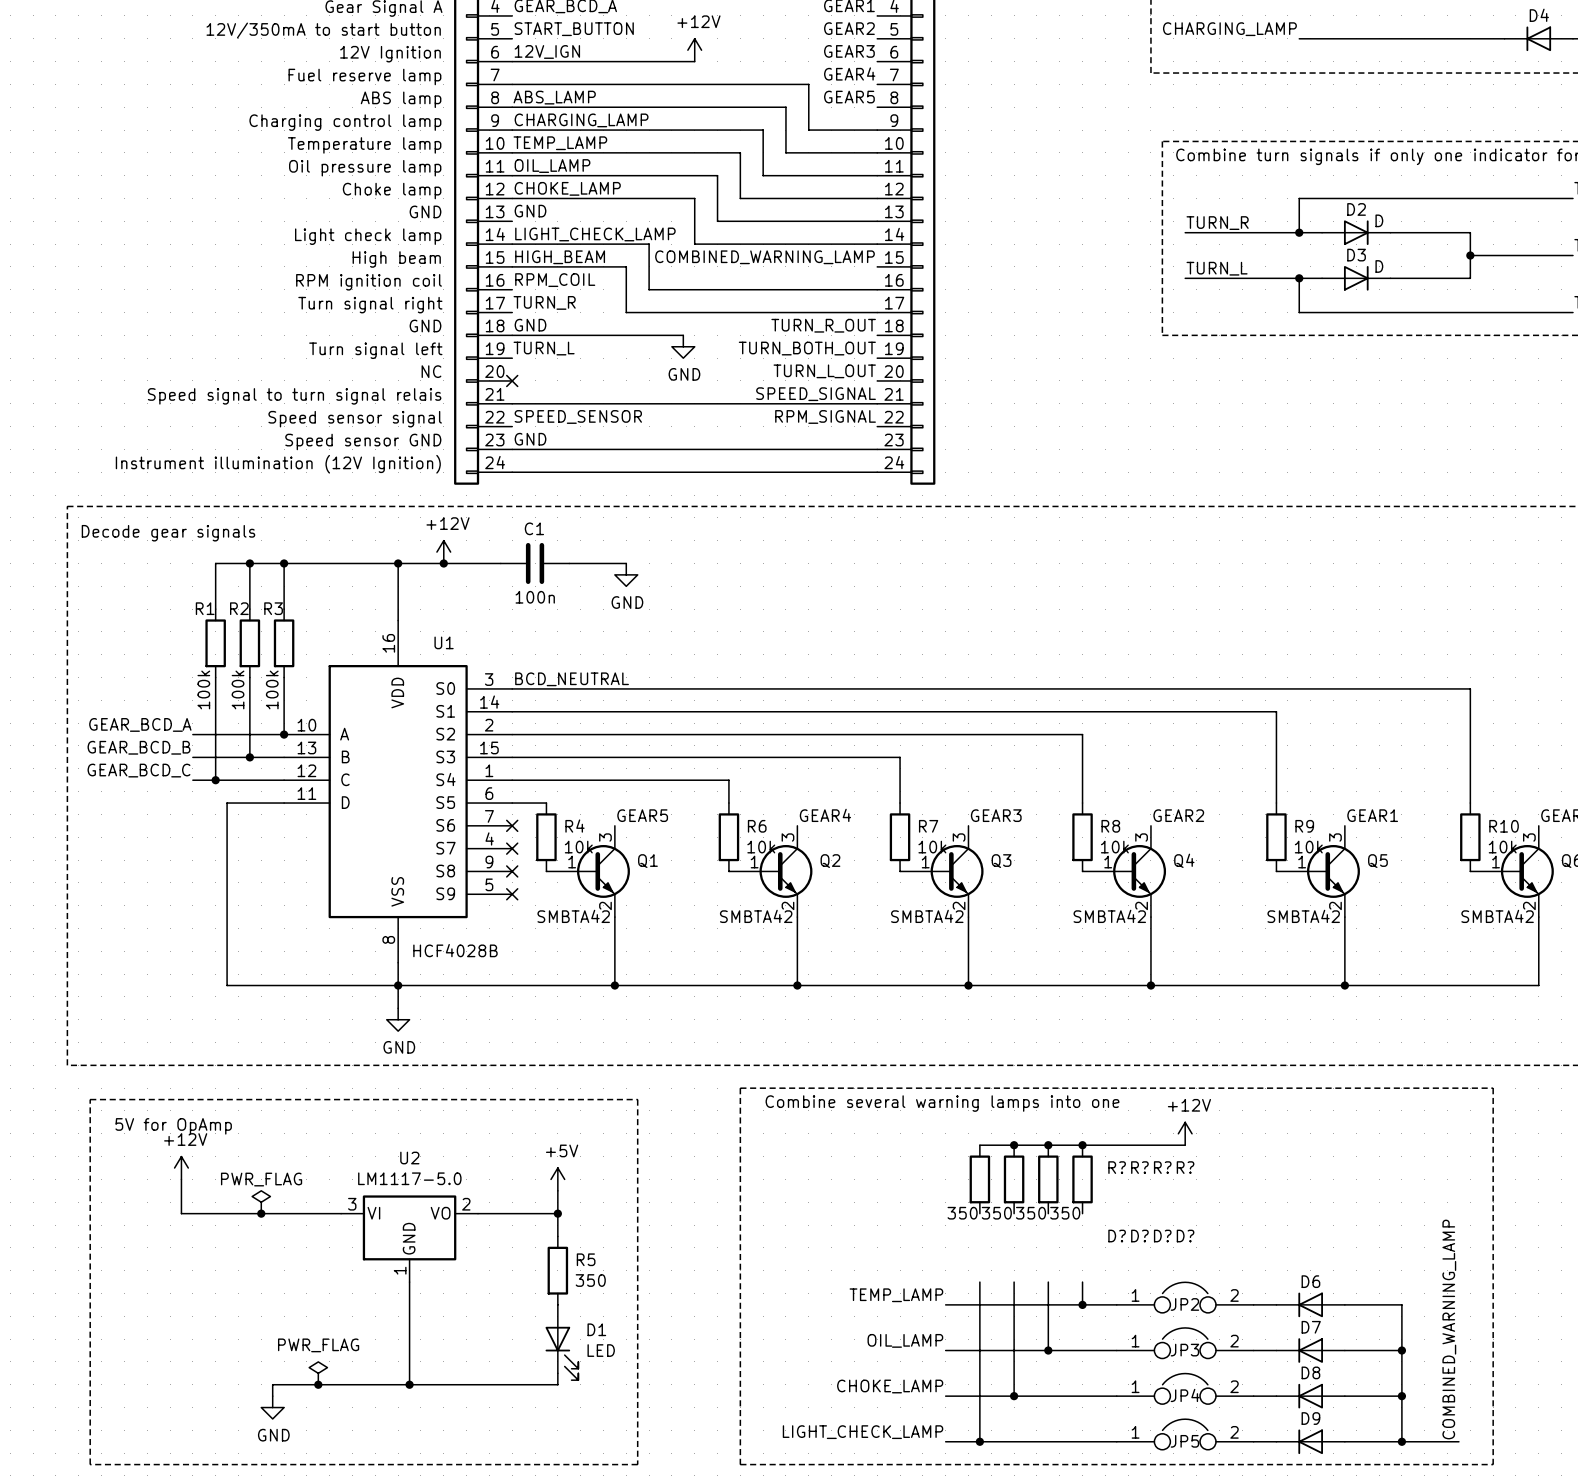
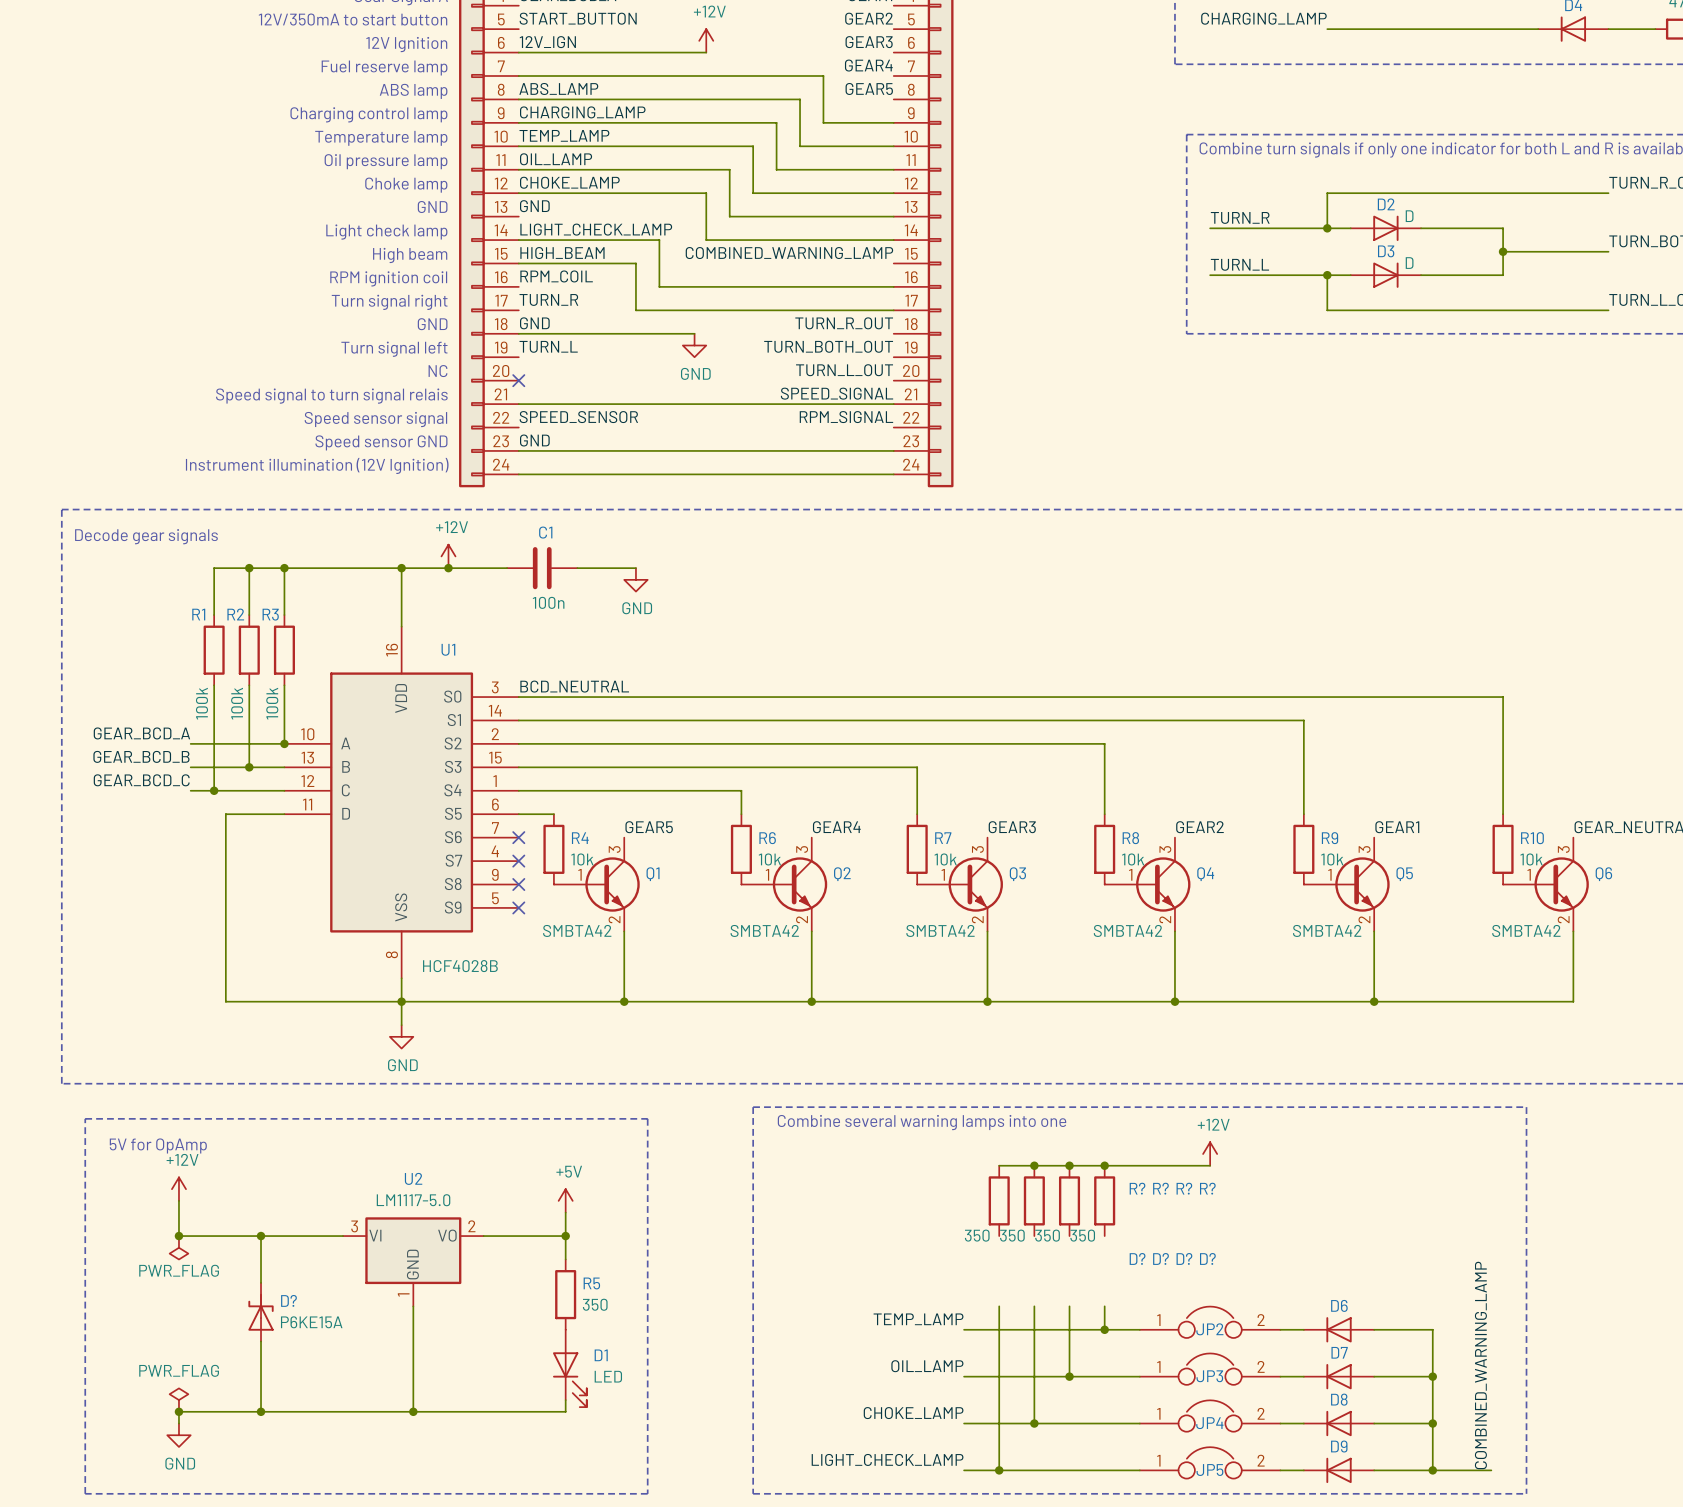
power symbol rotation: 0° (261, 1202) -> 180° (178, 1247)
power symbol position: PWR_FLAG (261, 1202) -> PWR_FLAG (178, 1247)
junction: none -> (178, 1236)
wire: none -> (261, 1236) (261, 1282)
D?: none -> P6KE15A (261, 1312)
wire: none -> (261, 1341) (261, 1411)
power symbol: none -> PWR_FLAG (178, 1400)
power symbol: PWR_FLAG (318, 1373) -> none
junction: none -> (178, 1411)
junction: none -> (261, 1411)
wire: (272, 1384) (272, 1396) -> (272, 1411) (178, 1411) (178, 1423)
junction: (318, 1384) -> none
power symbol position: GND (272, 1407) -> GND (178, 1435)

